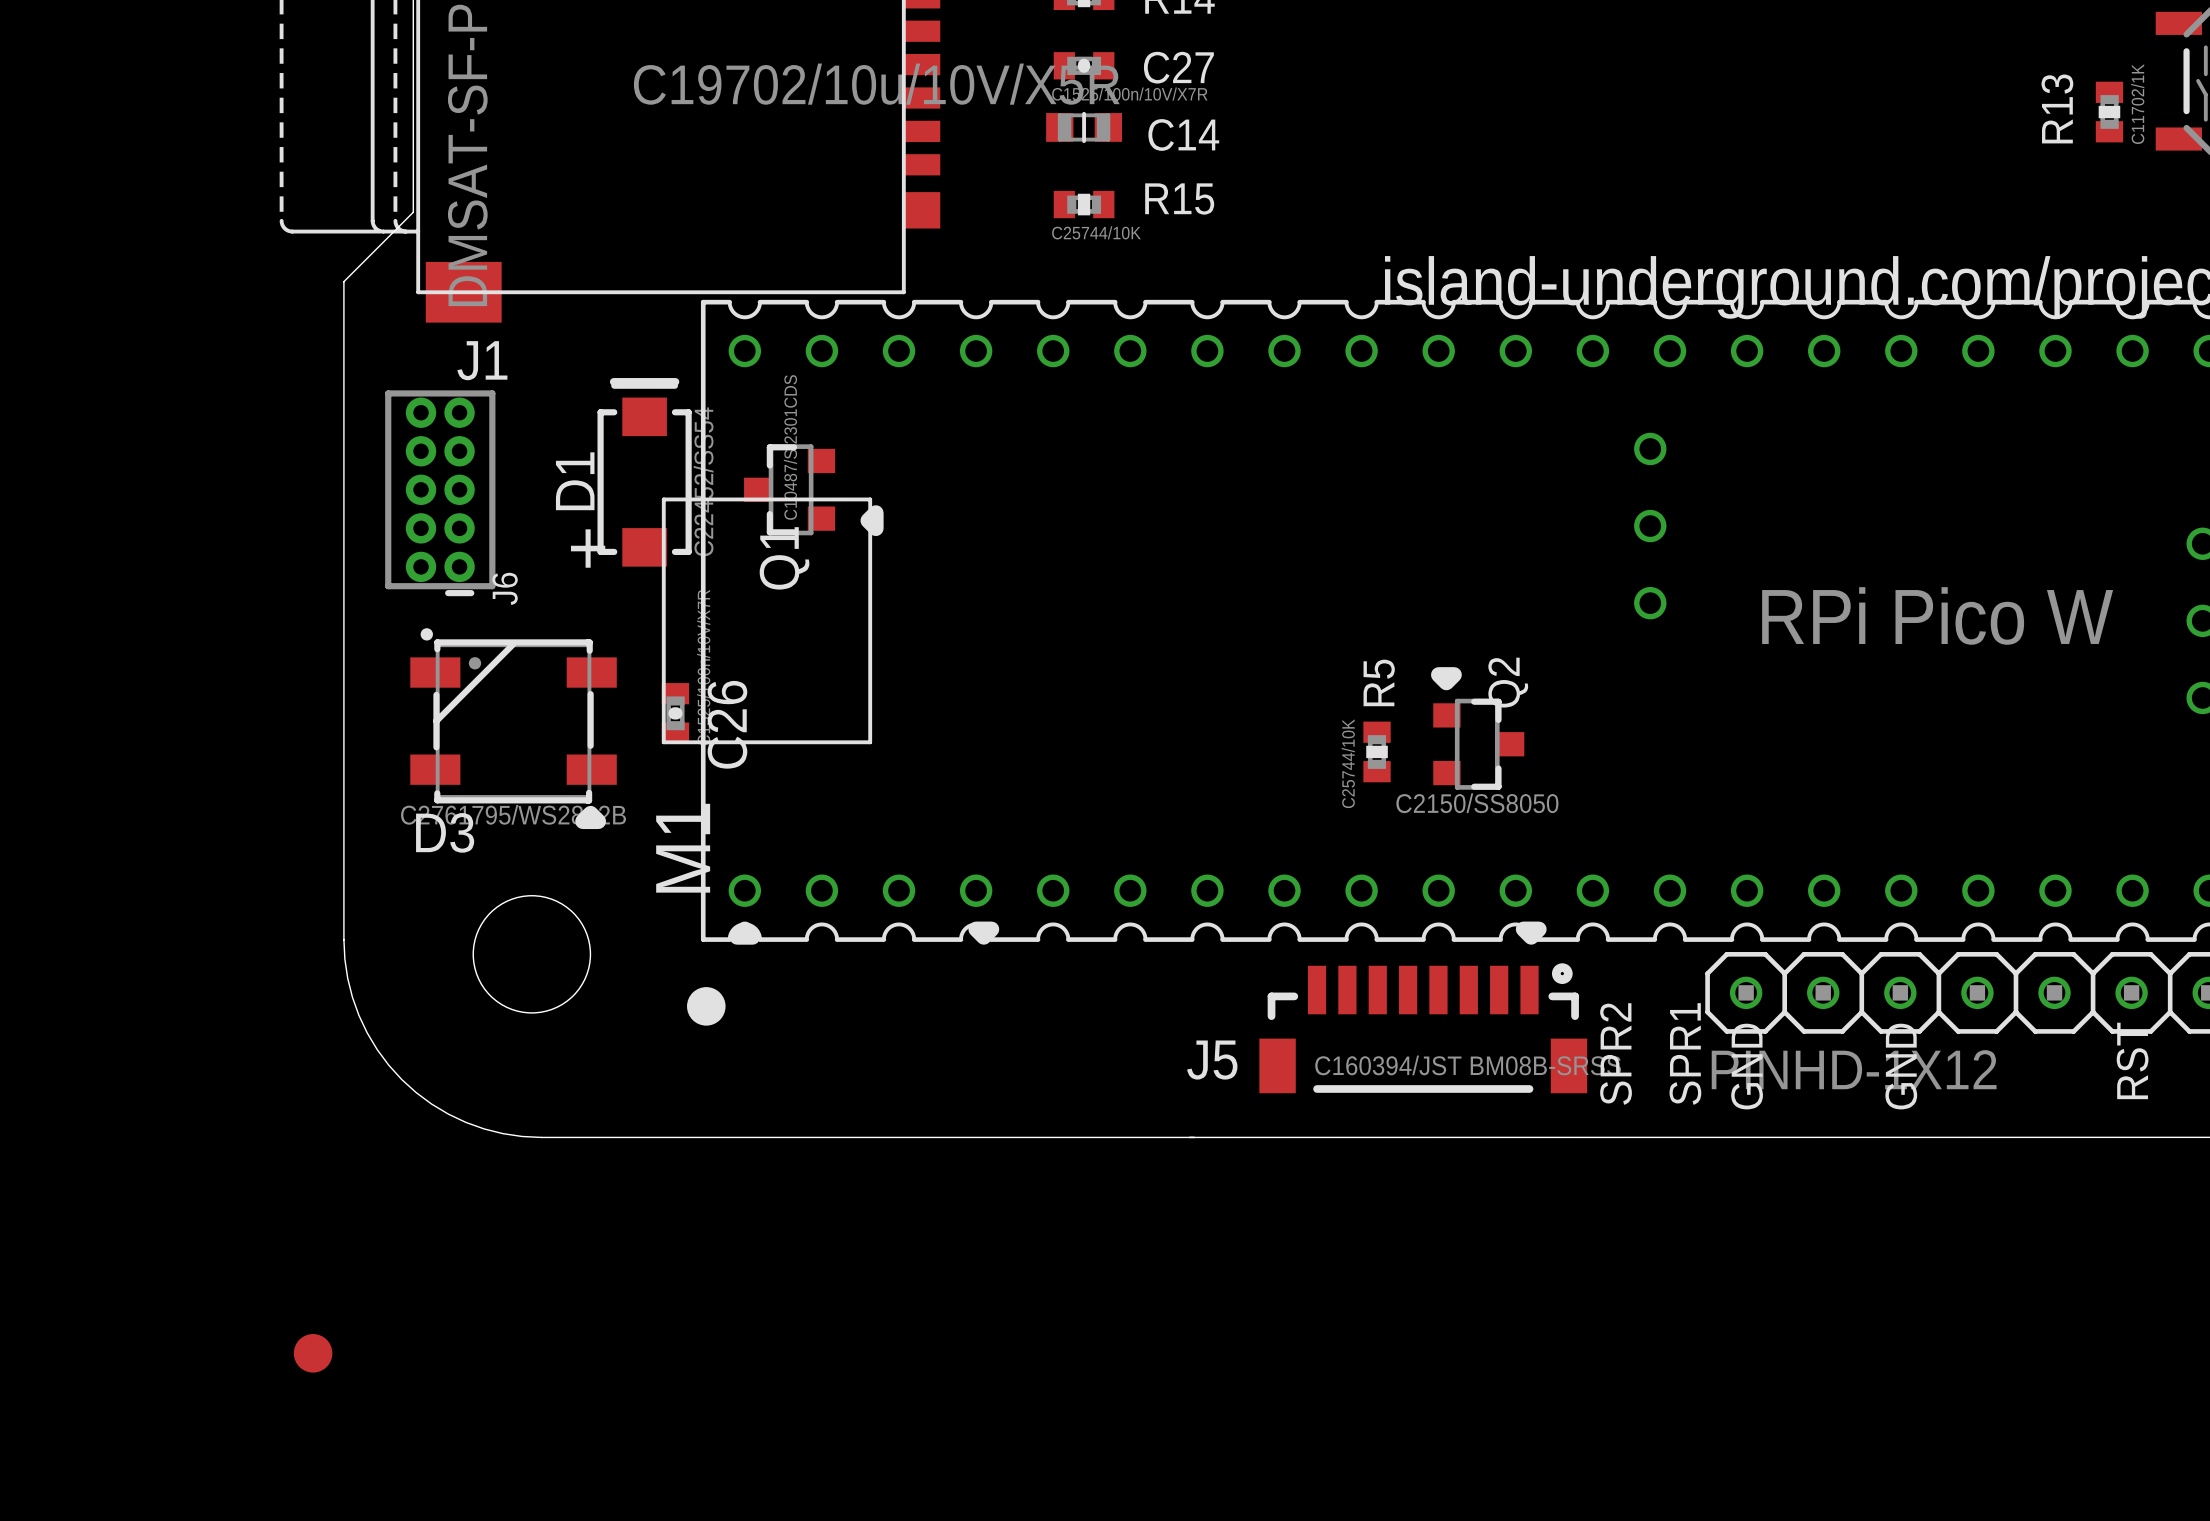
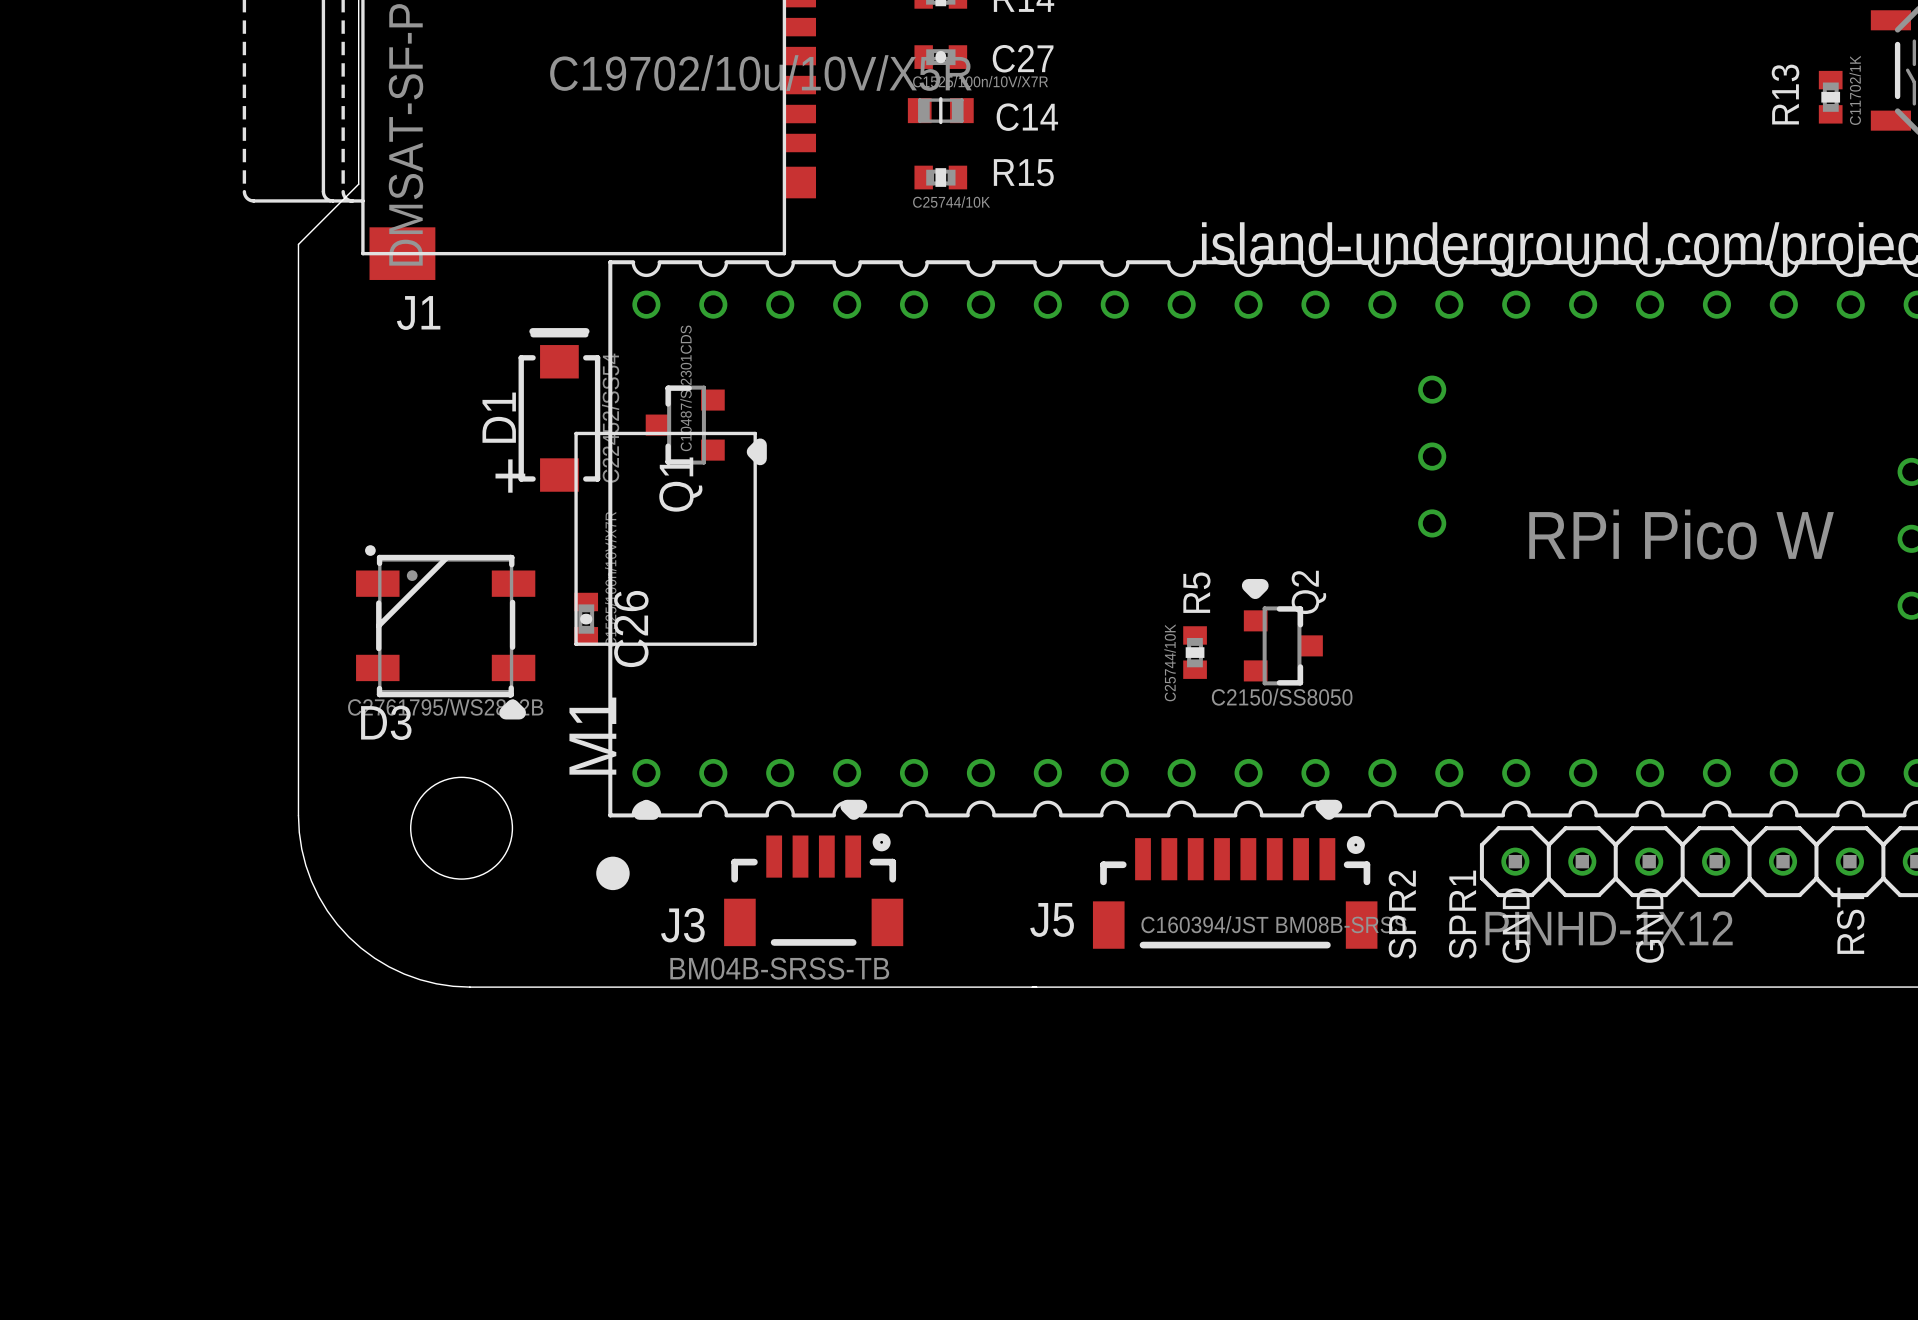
J6: (440, 493) -> none
J3: none -> BM04B-SRSS-TB (813, 889)
part: (313, 1353) -> none

